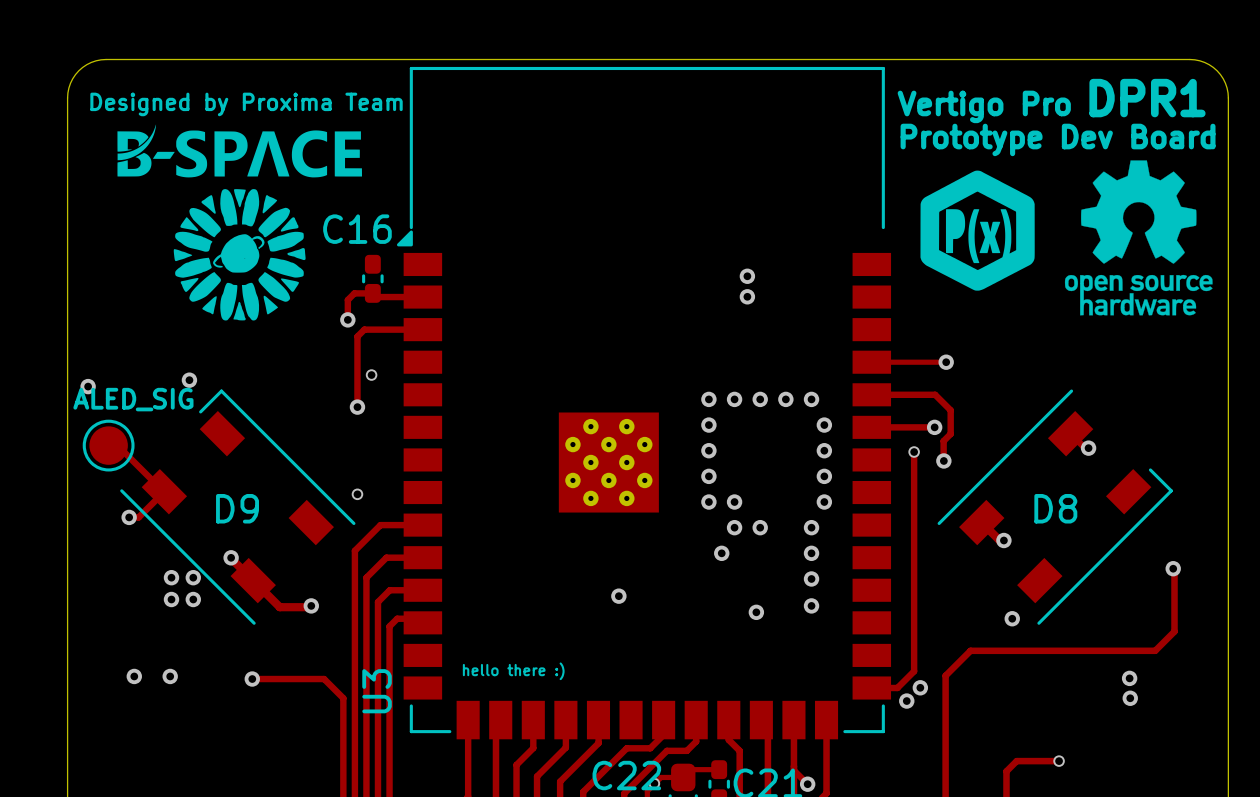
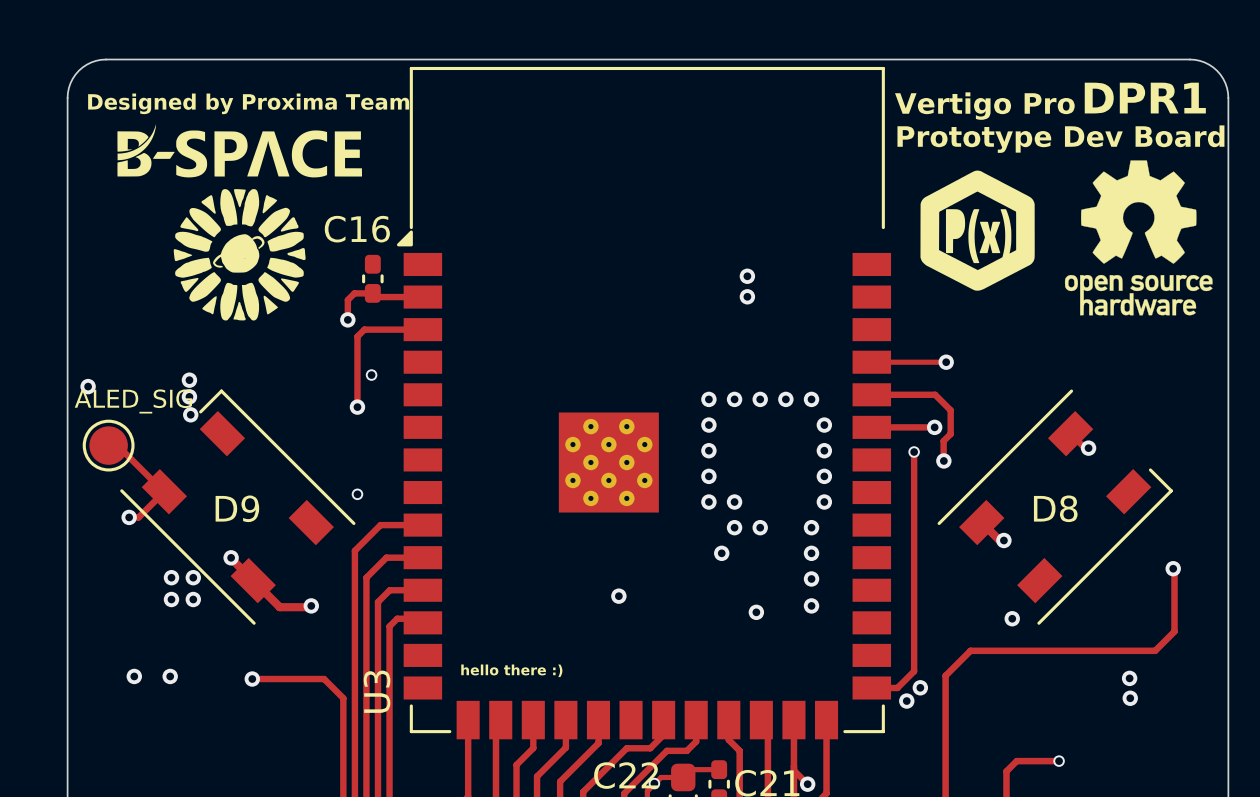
via: none -> (189, 396)
via: none -> (190, 414)

